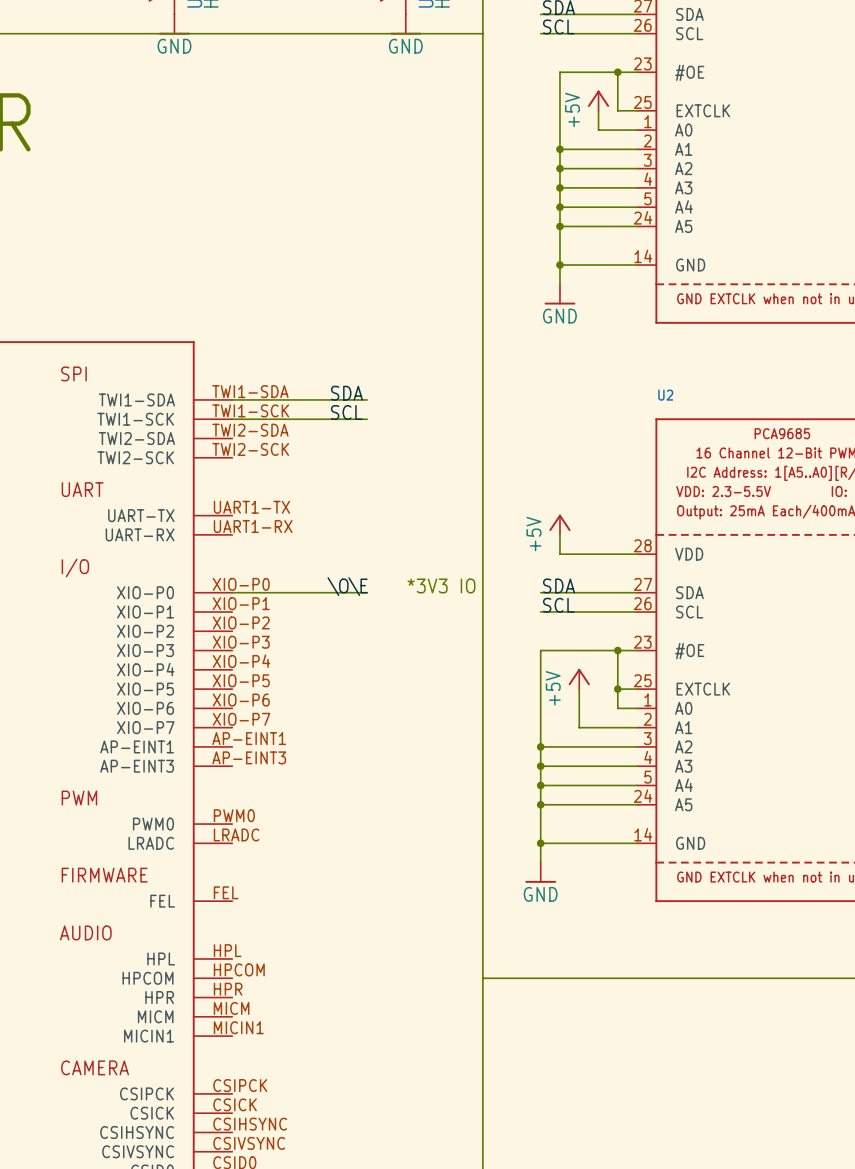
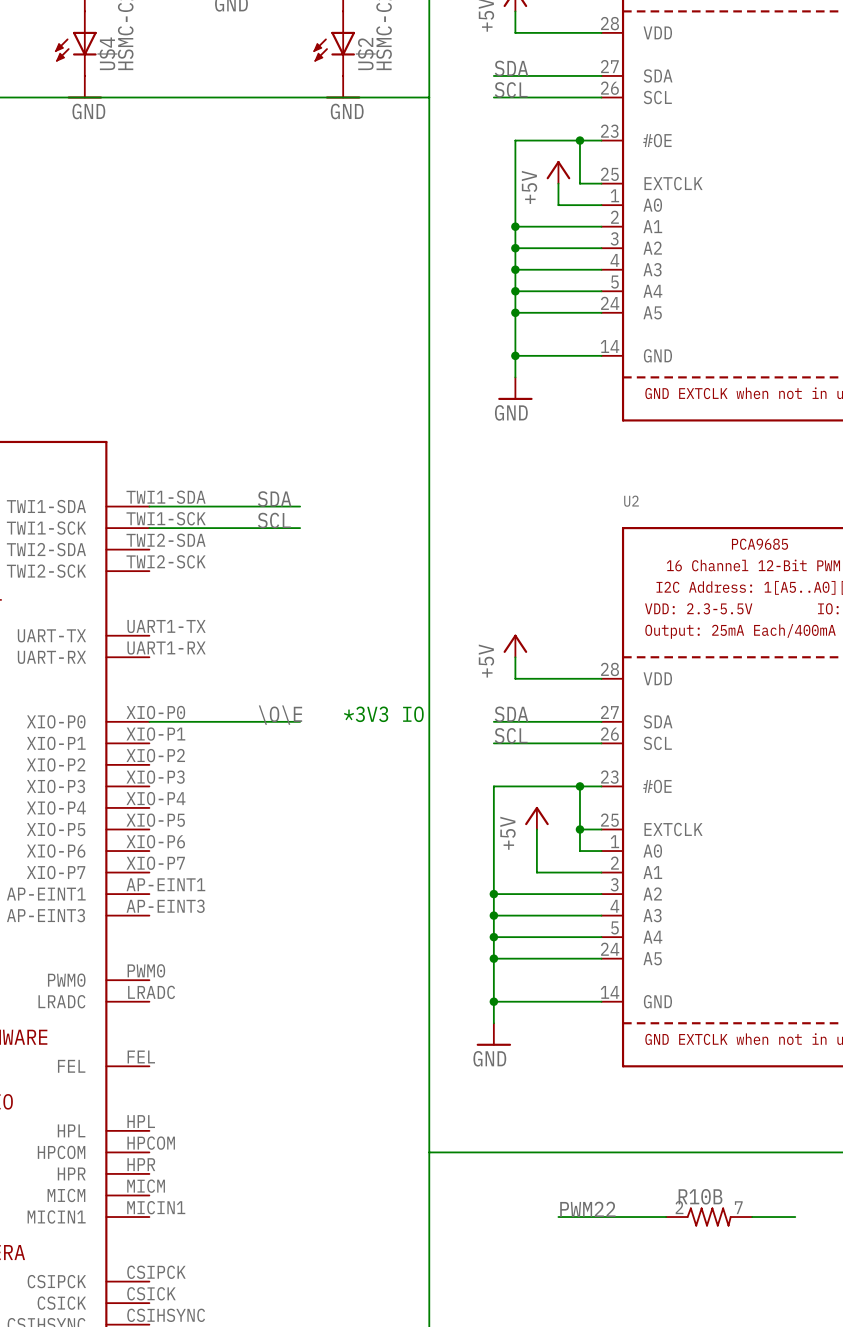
label: none -> PWM22 (587, 1209)
wire: none -> (558, 1217) (666, 1217)
R10B: none -> (709, 1217)
wire: none -> (752, 1217) (795, 1217)

